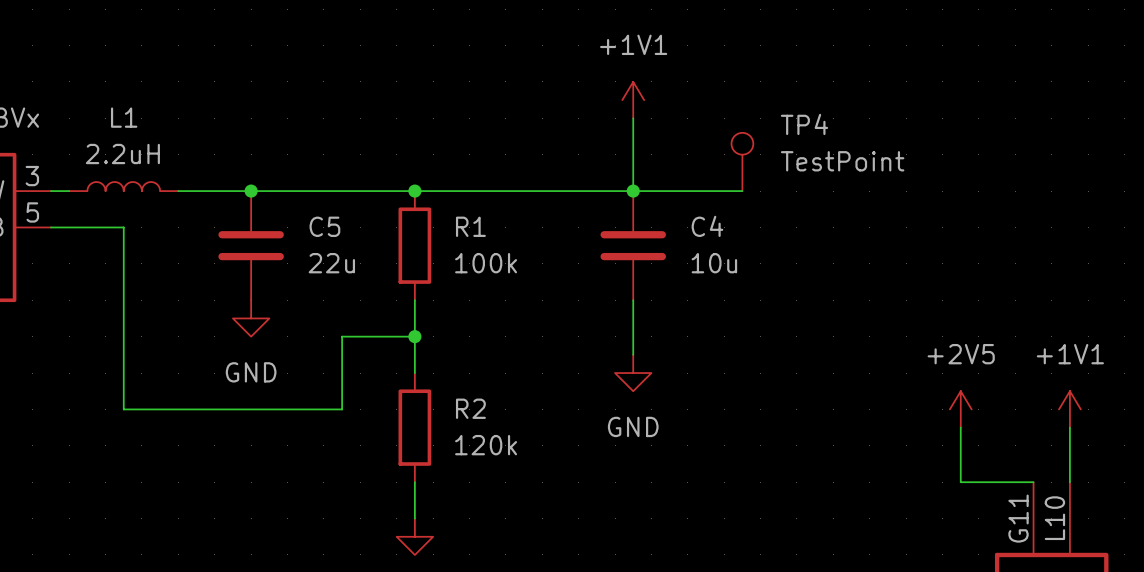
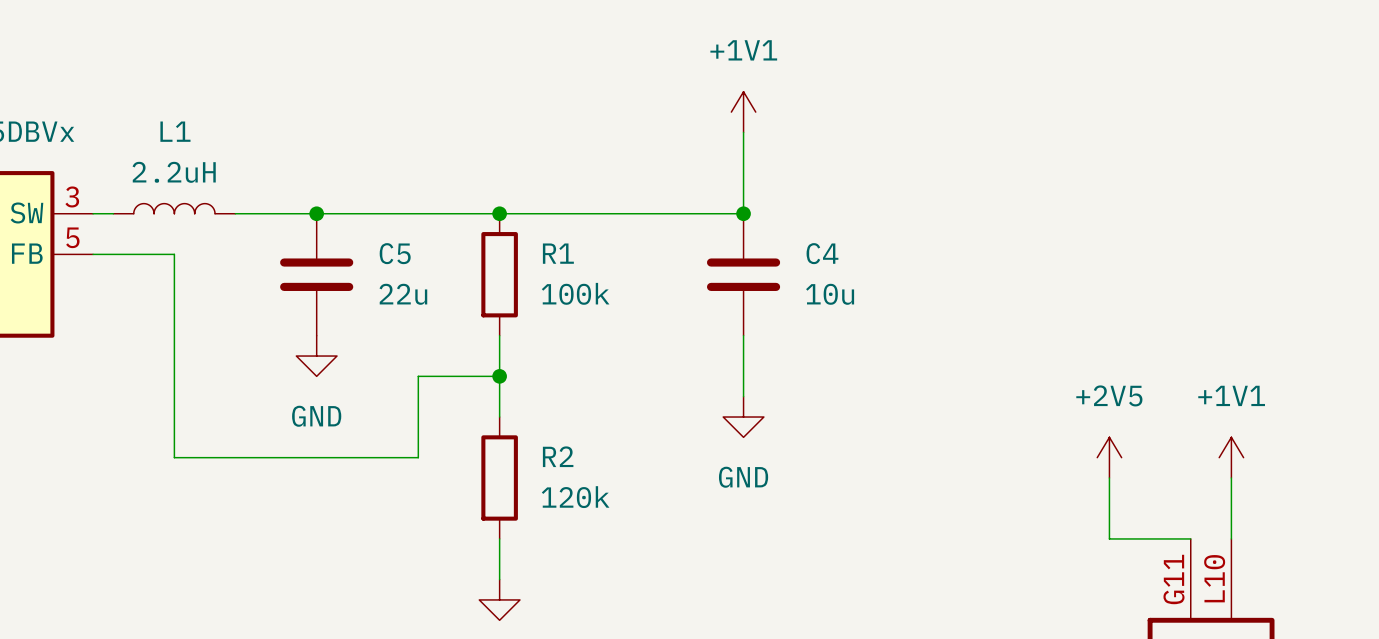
TP4: TestPoint (742, 161) -> none
wire: (633, 191) (742, 191) -> none

